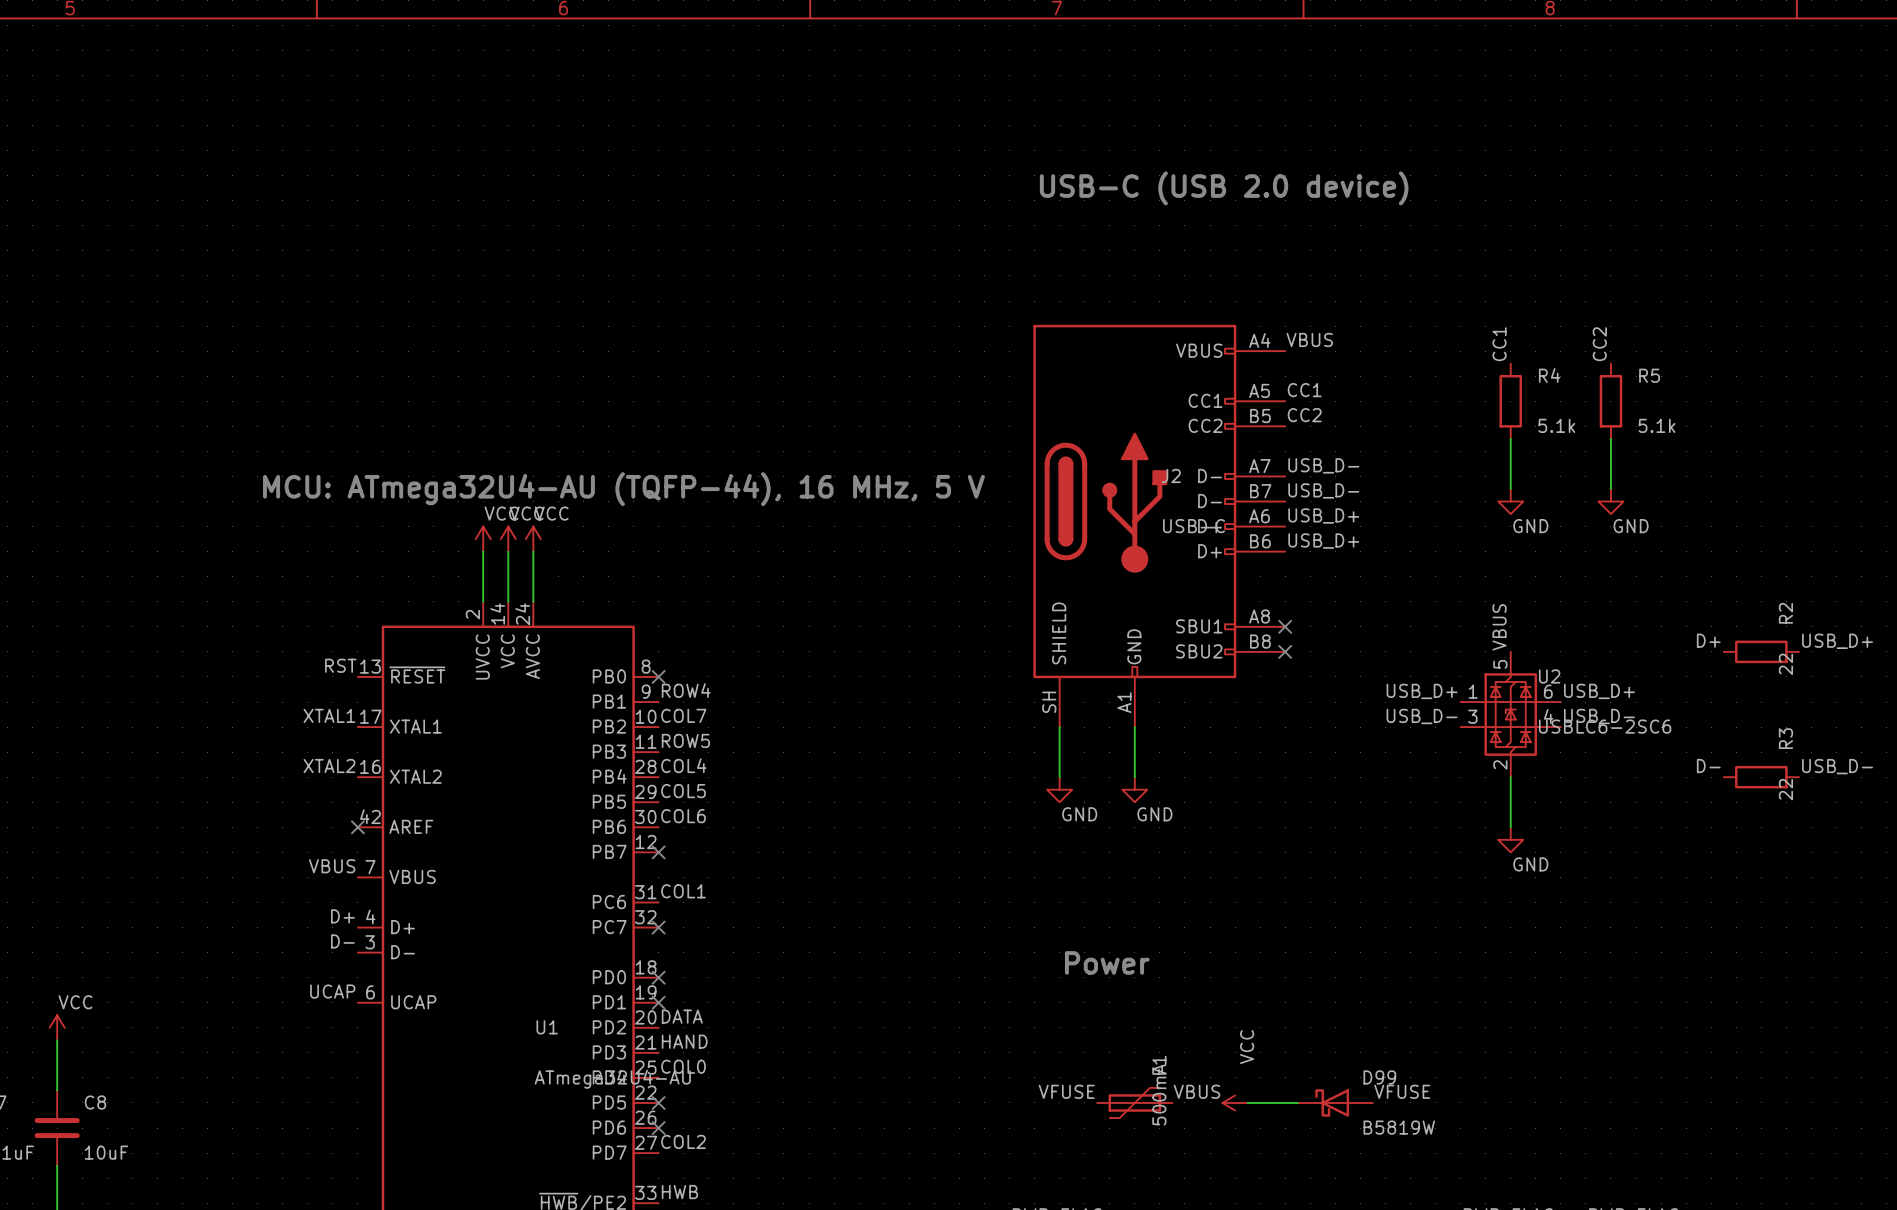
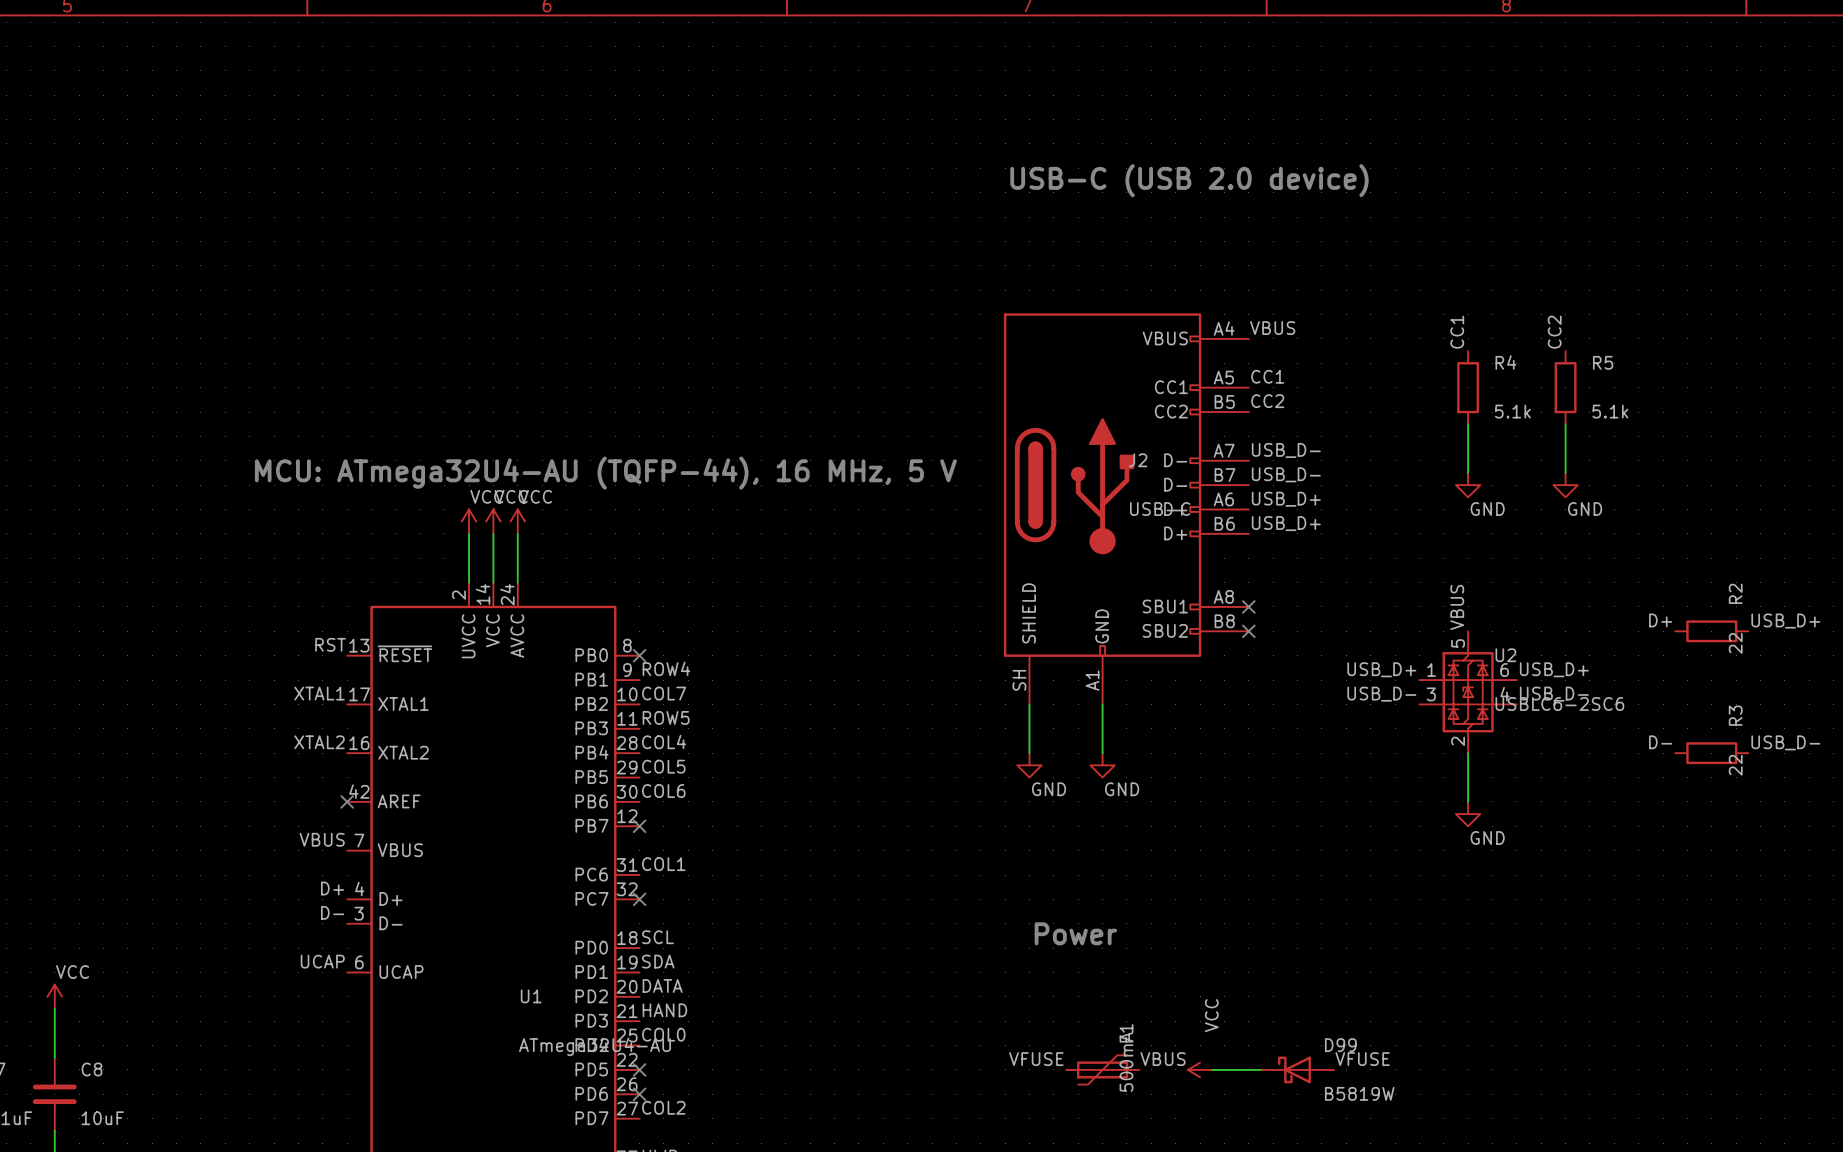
label: none -> SCL (657, 937)
no-connect mark: (658, 977) -> none
label: none -> SDA (658, 961)
no-connect mark: (658, 1002) -> none

